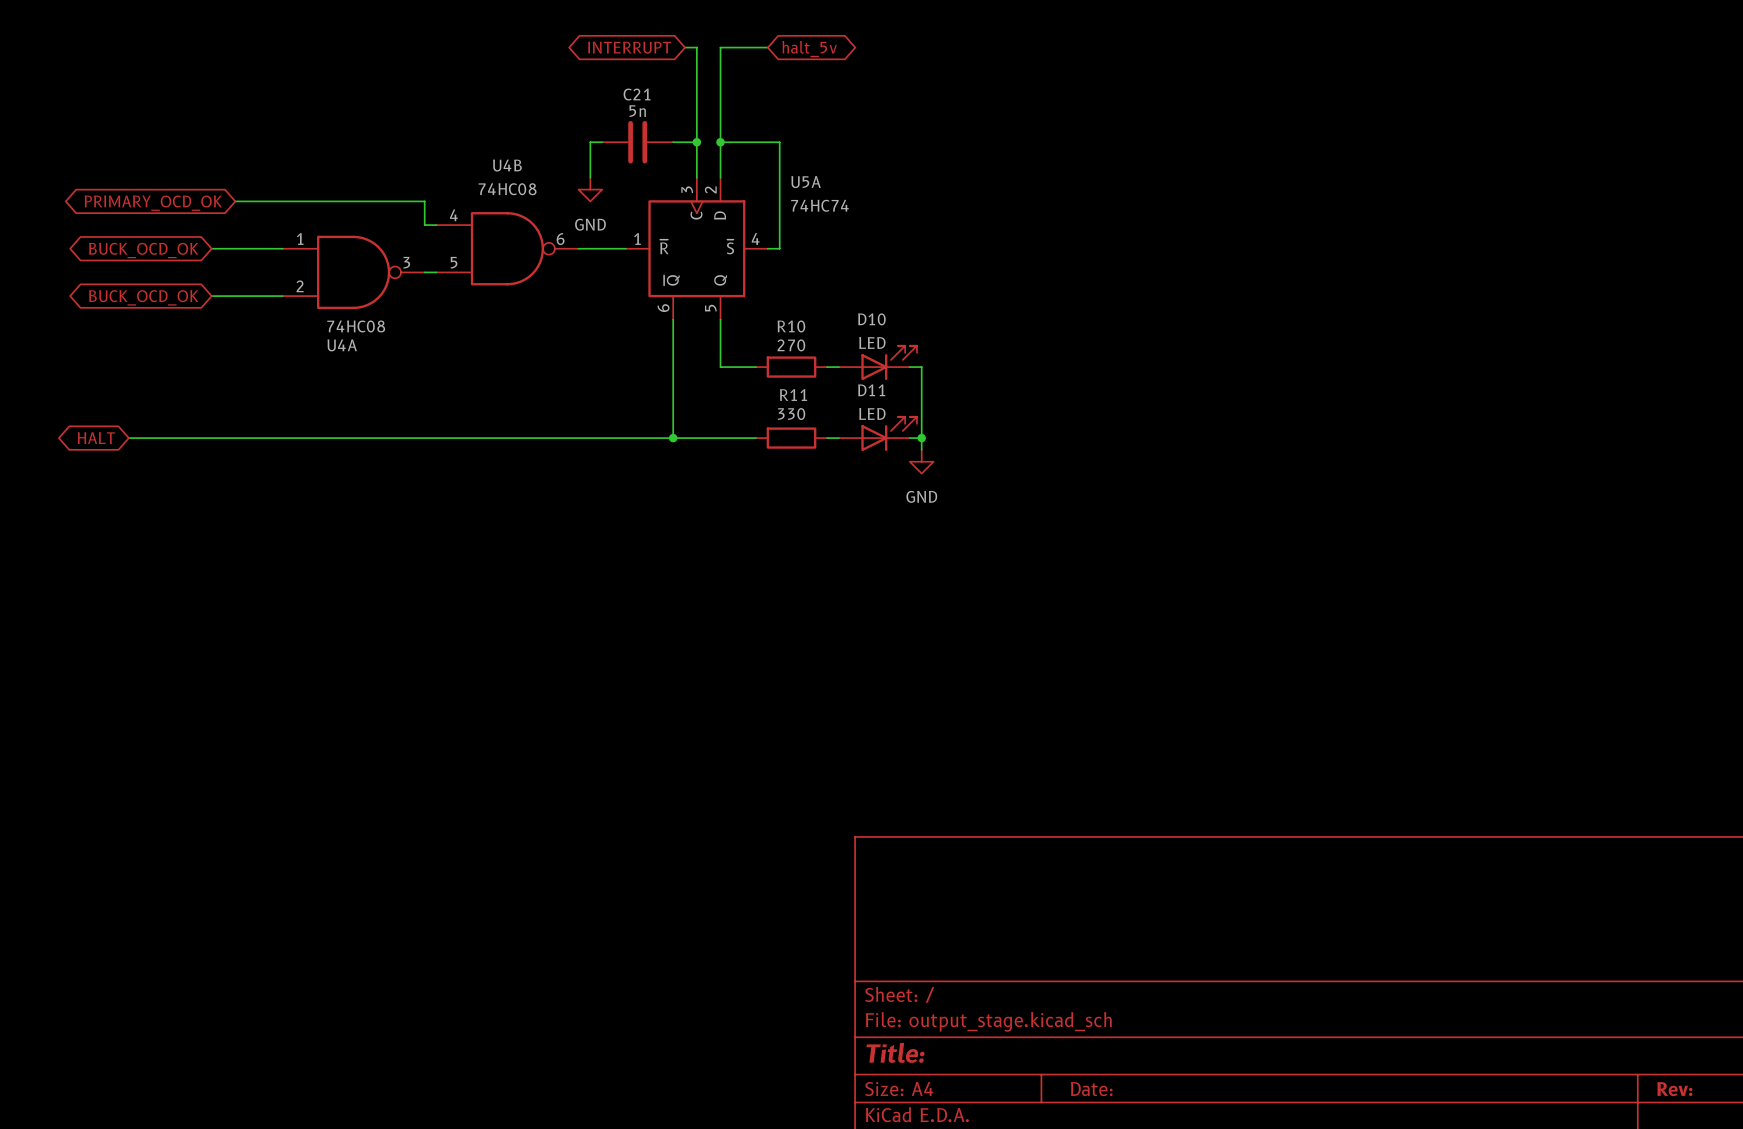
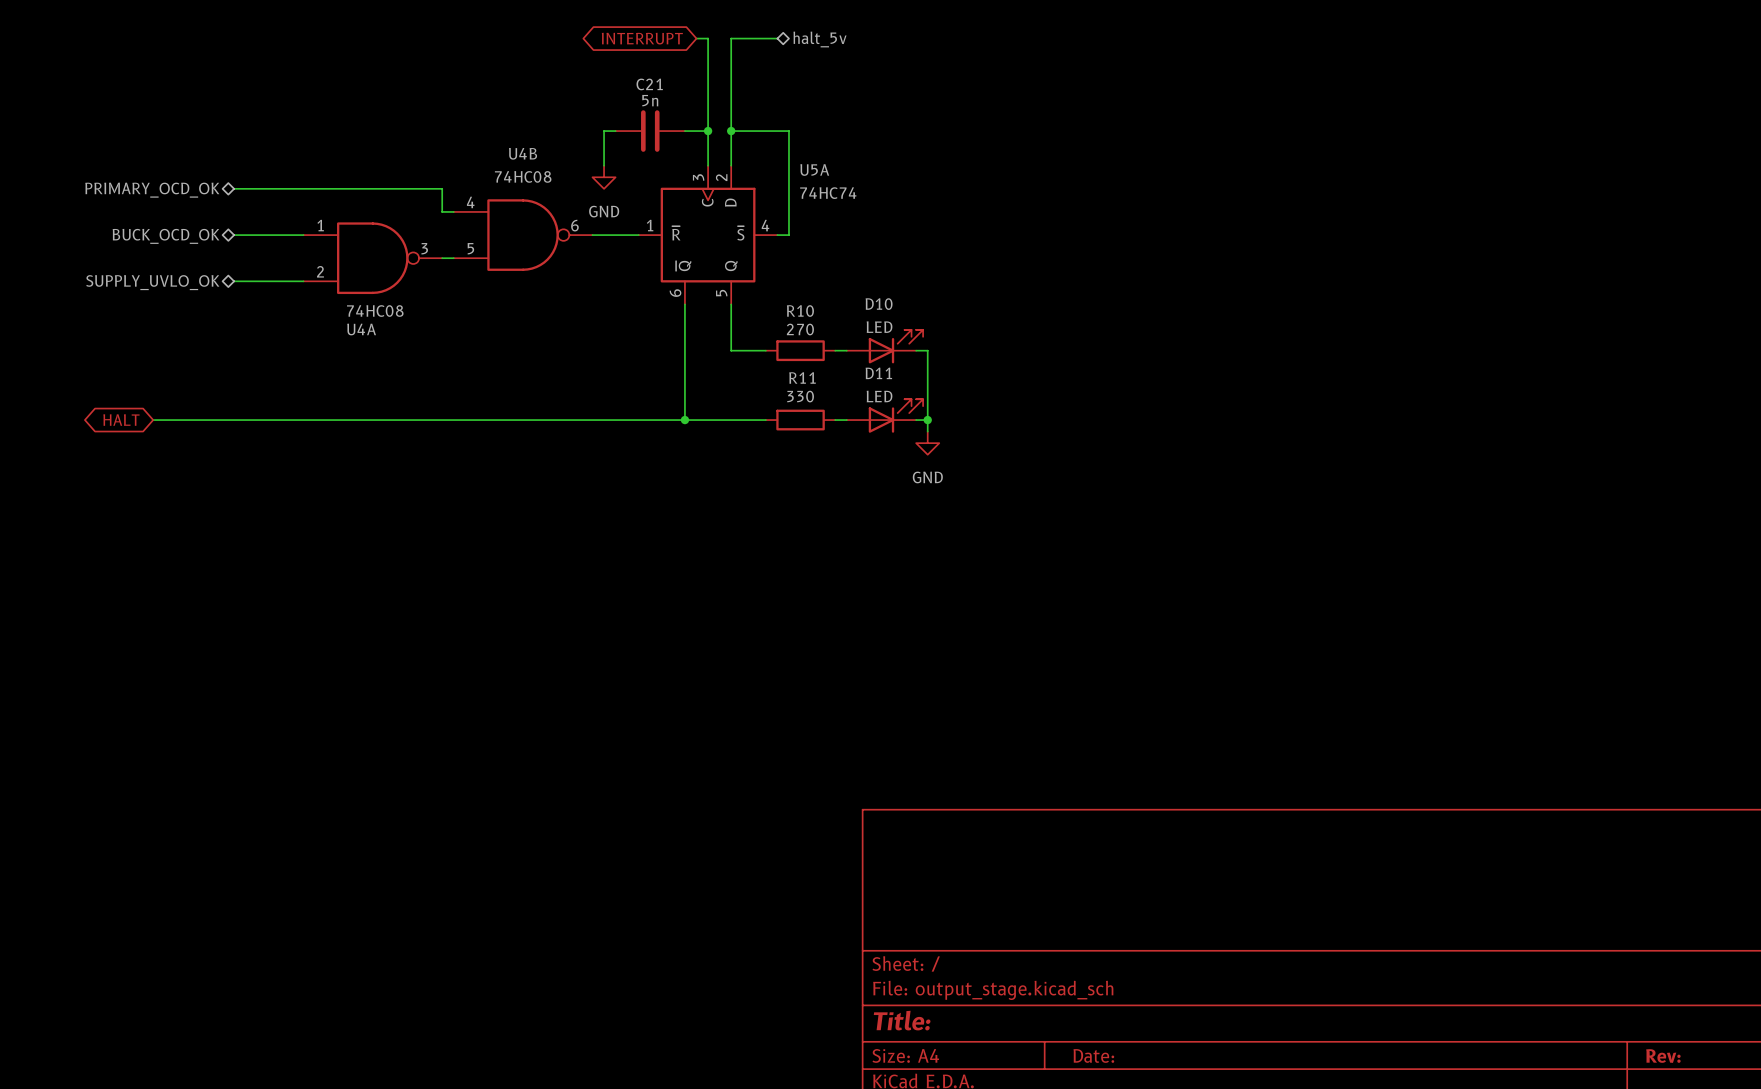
global label: halt_5v (809, 48) -> none
hierarchical label: none -> halt_5v (820, 39)
wire: none -> (234, 188) (257, 188)
hierarchical label: none -> PRIMARY_OCD_OK (152, 190)
global label: PRIMARY_OCD_OK (153, 203) -> none
hierarchical label: none -> BUCK_OCD_OK (166, 236)
global label: BUCK_OCD_OK (143, 250) -> none
hierarchical label: none -> SUPPLY_UVLO_OK (152, 282)
global label: BUCK_OCD_OK (143, 297) -> none

